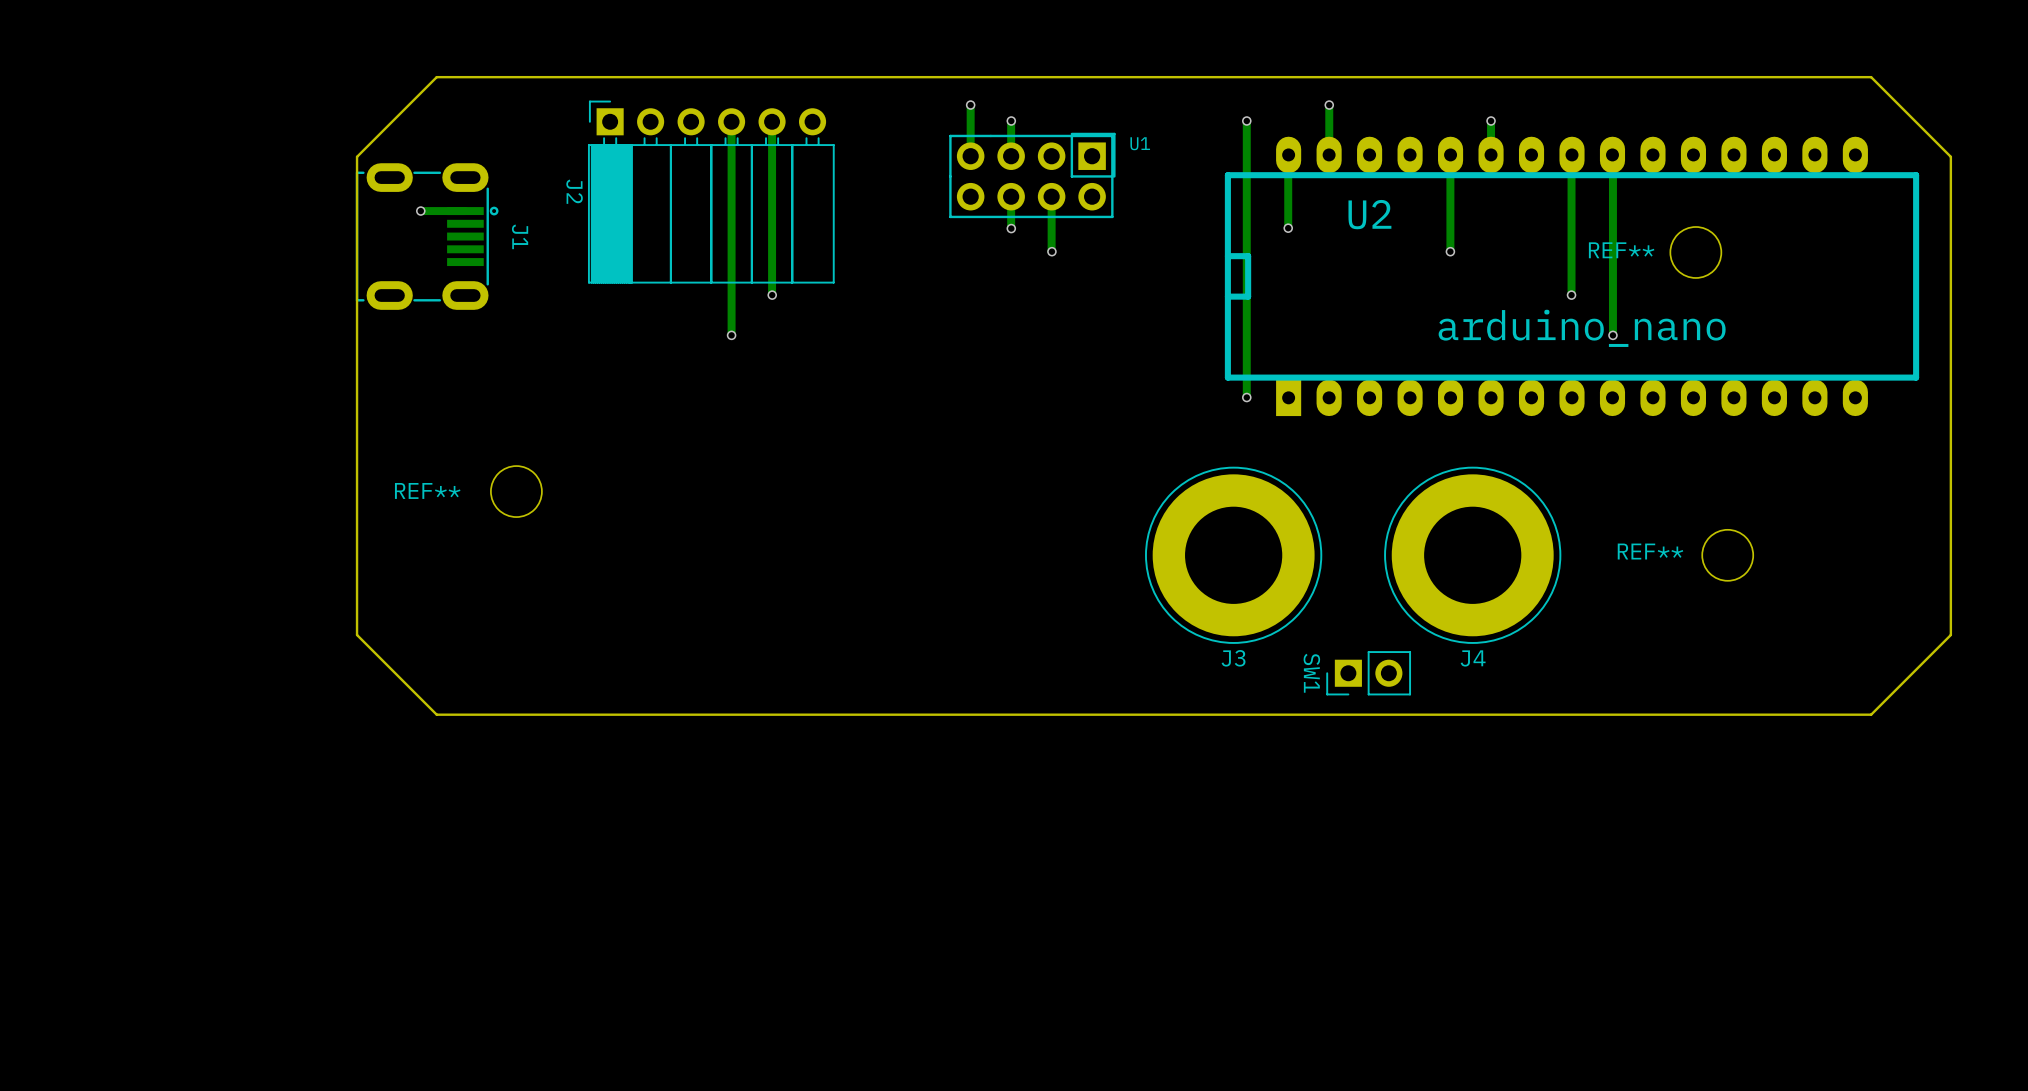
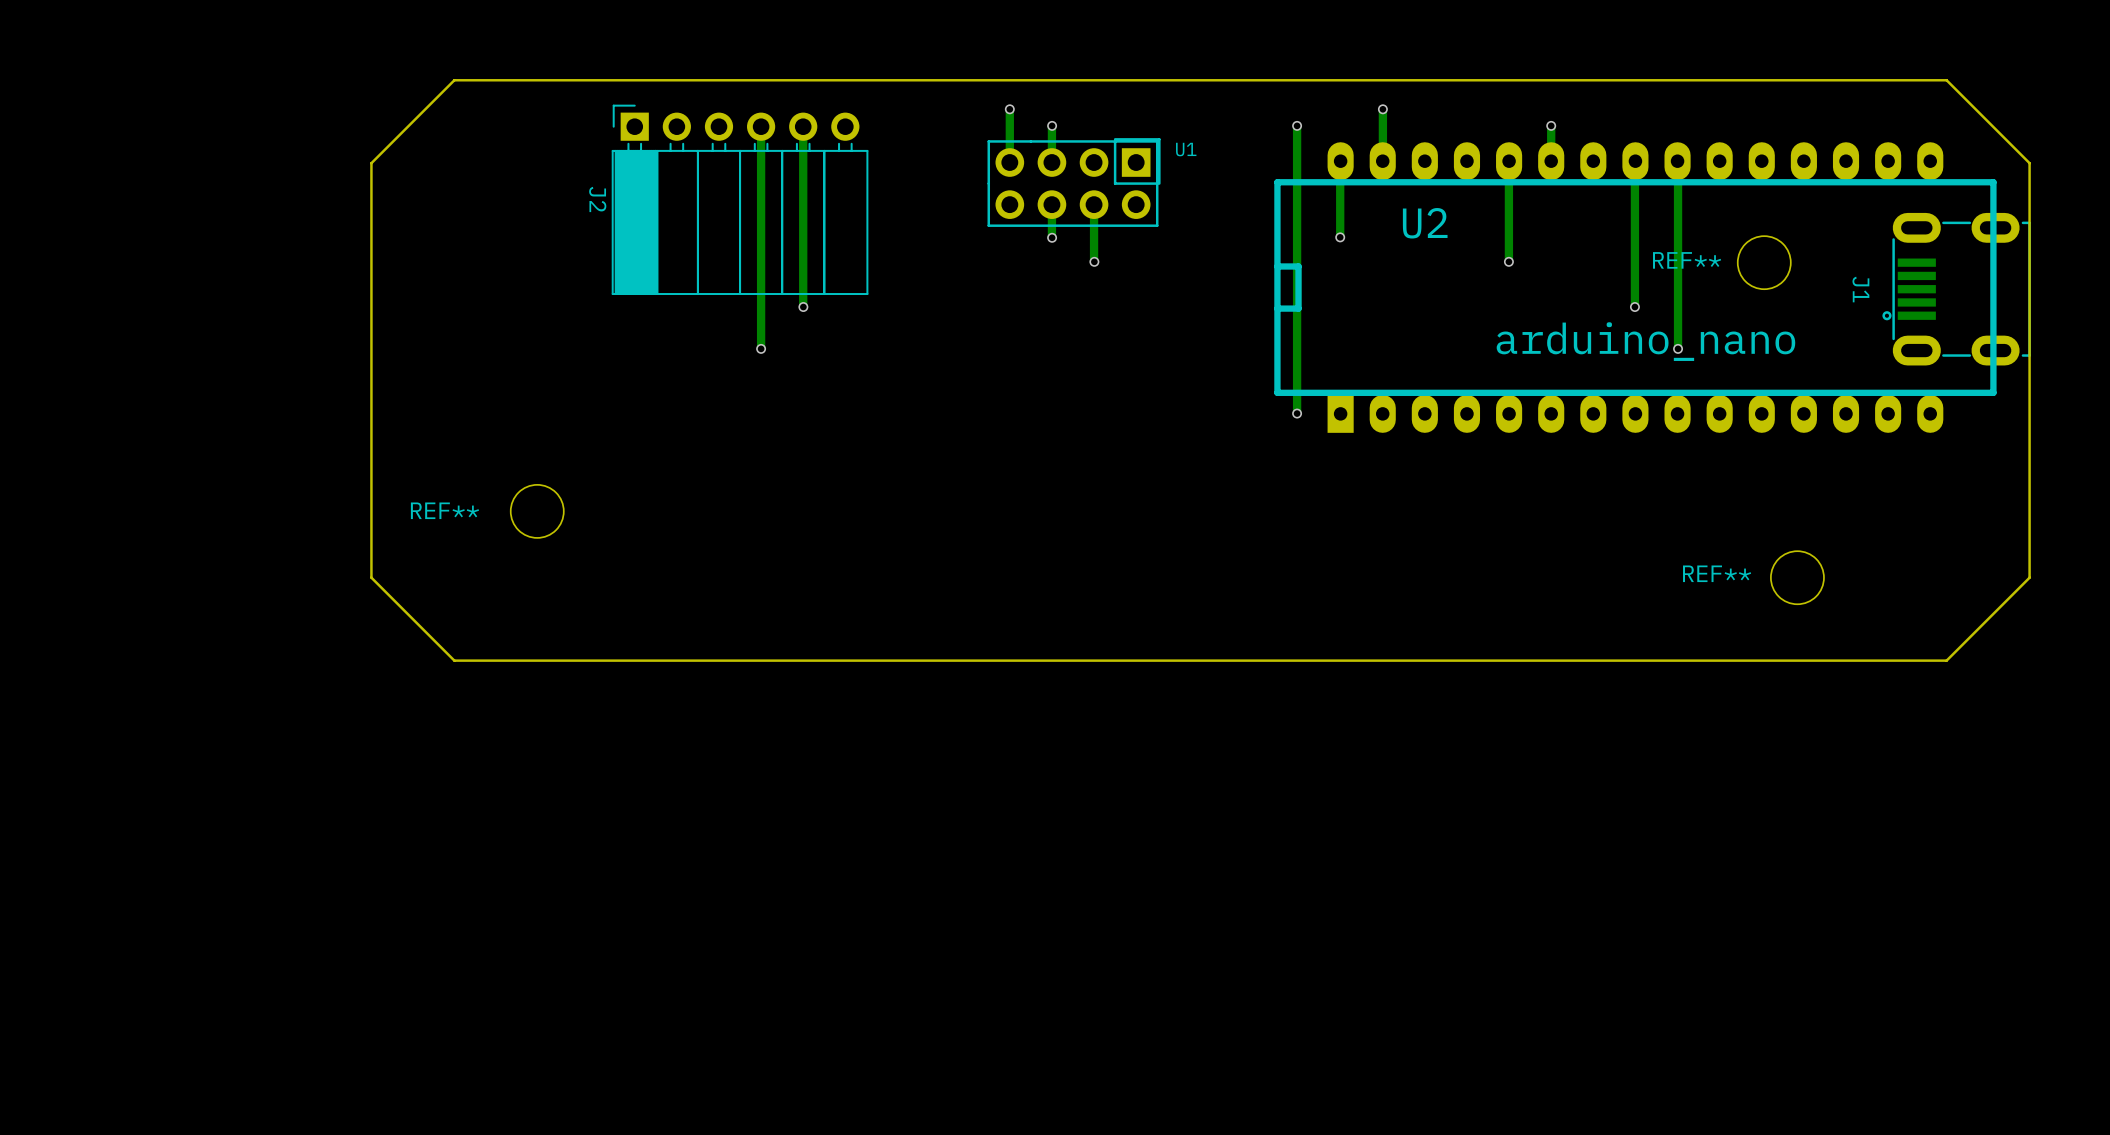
via: (420, 211) -> none
track: (465, 211) (420, 211) -> none
J1 rotation: 0° (427, 236) -> 180° (1956, 289)
J1 position: (427, 236) -> (1956, 289)
J3: (1233, 555) -> none
J4: (1472, 555) -> none
board edge: (1950, 555) (1950, 635) (1871, 714) (436, 714) (357, 635) (357, 555) -> (2029, 577) (1946, 660) (454, 660) (371, 577)
SW1: (1368, 673) -> none

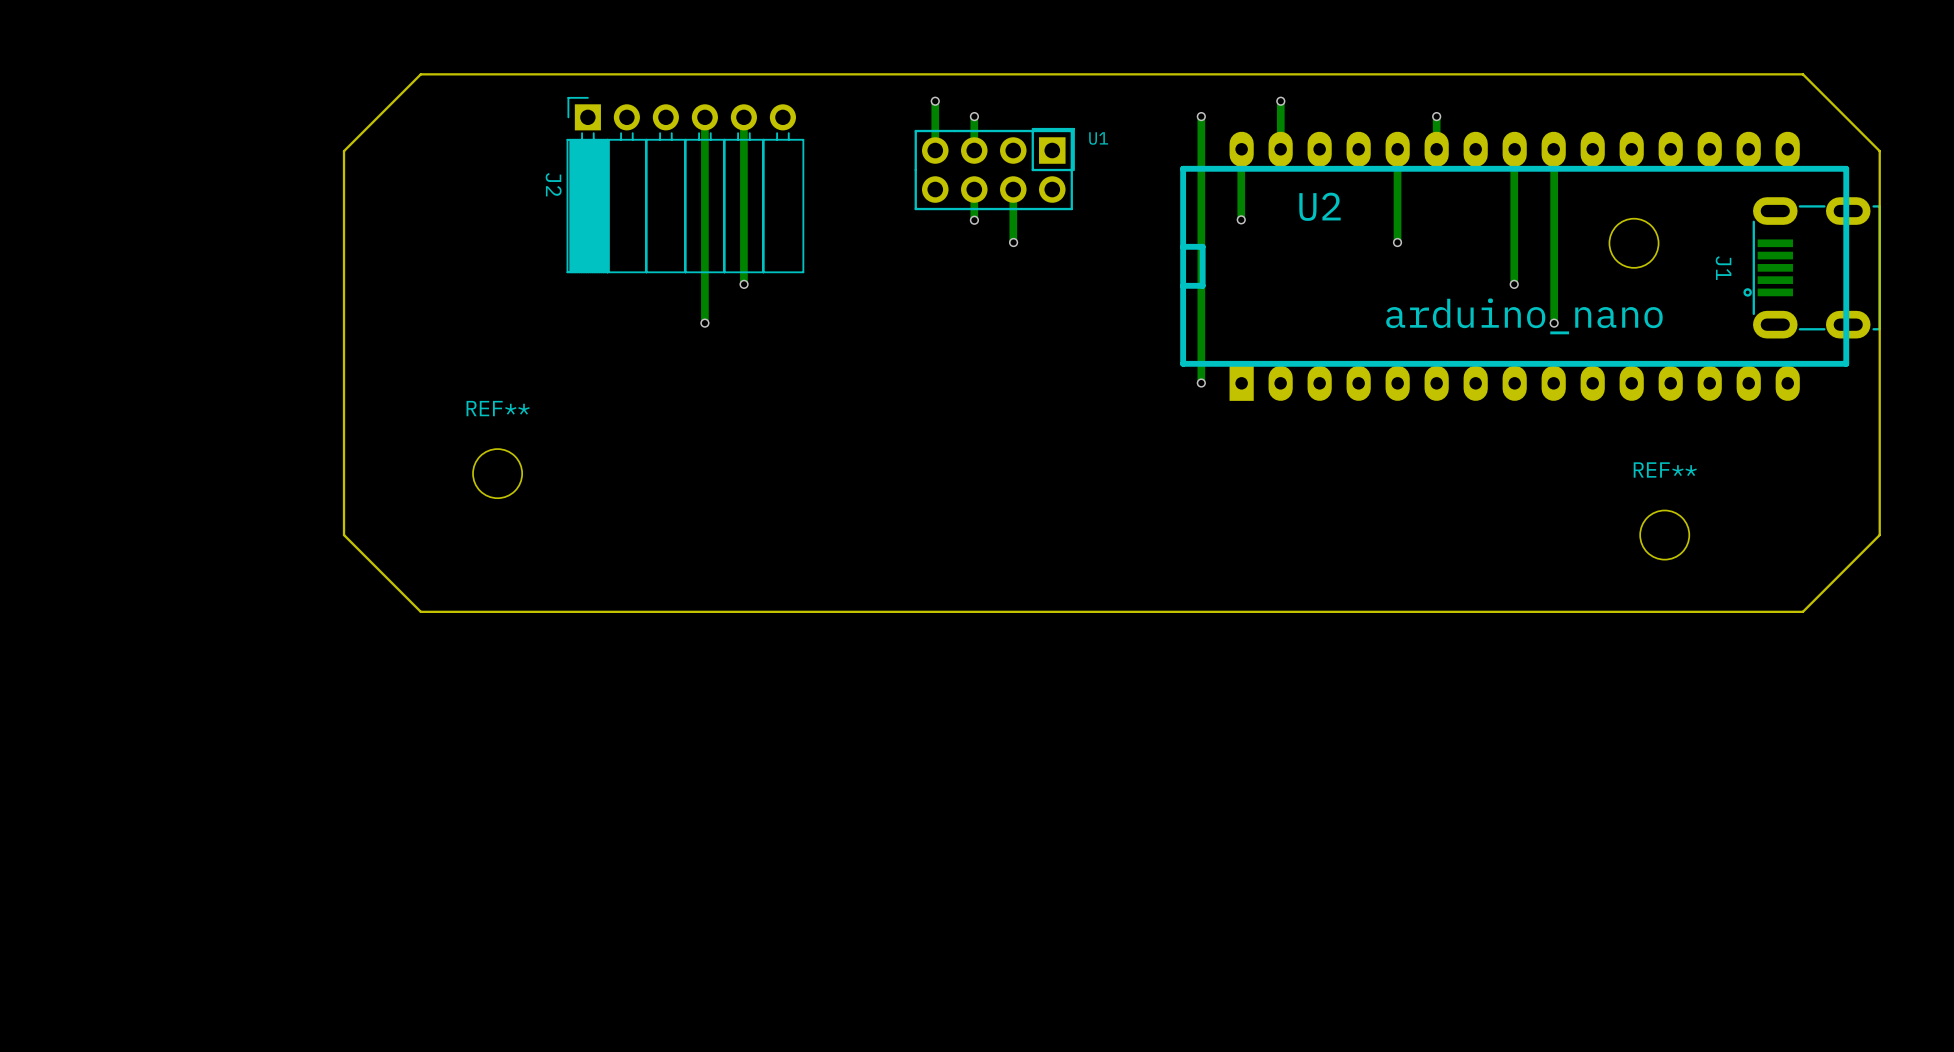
REF** name: REF** (1687, 260) -> none
REF** name position: REF** (444, 510) -> REF** (498, 408)
REF** name position: REF** (1717, 573) -> REF** (1665, 469)

